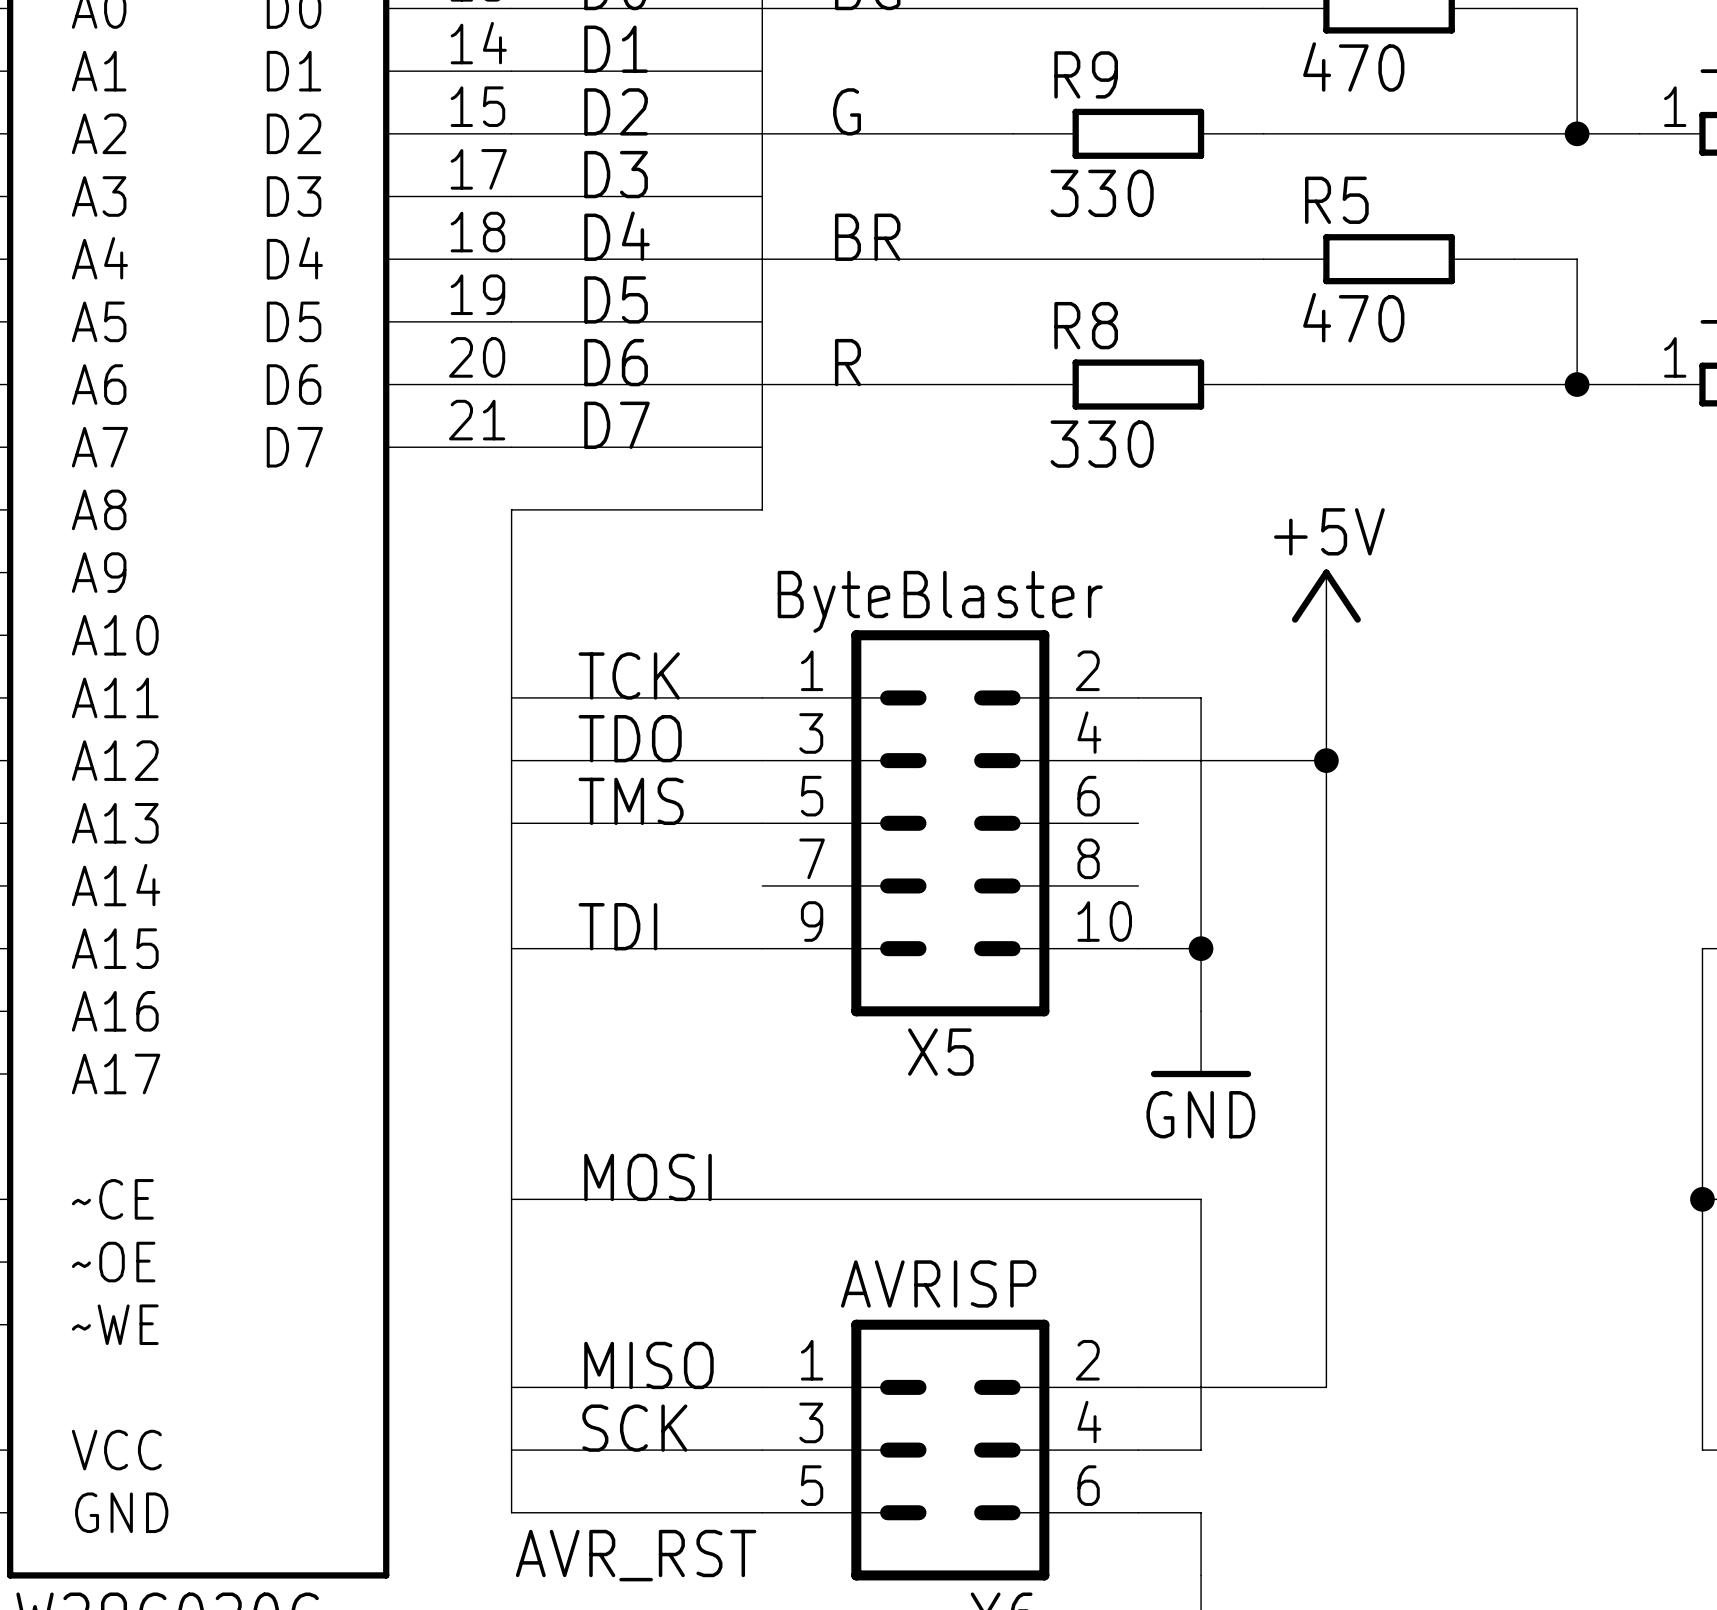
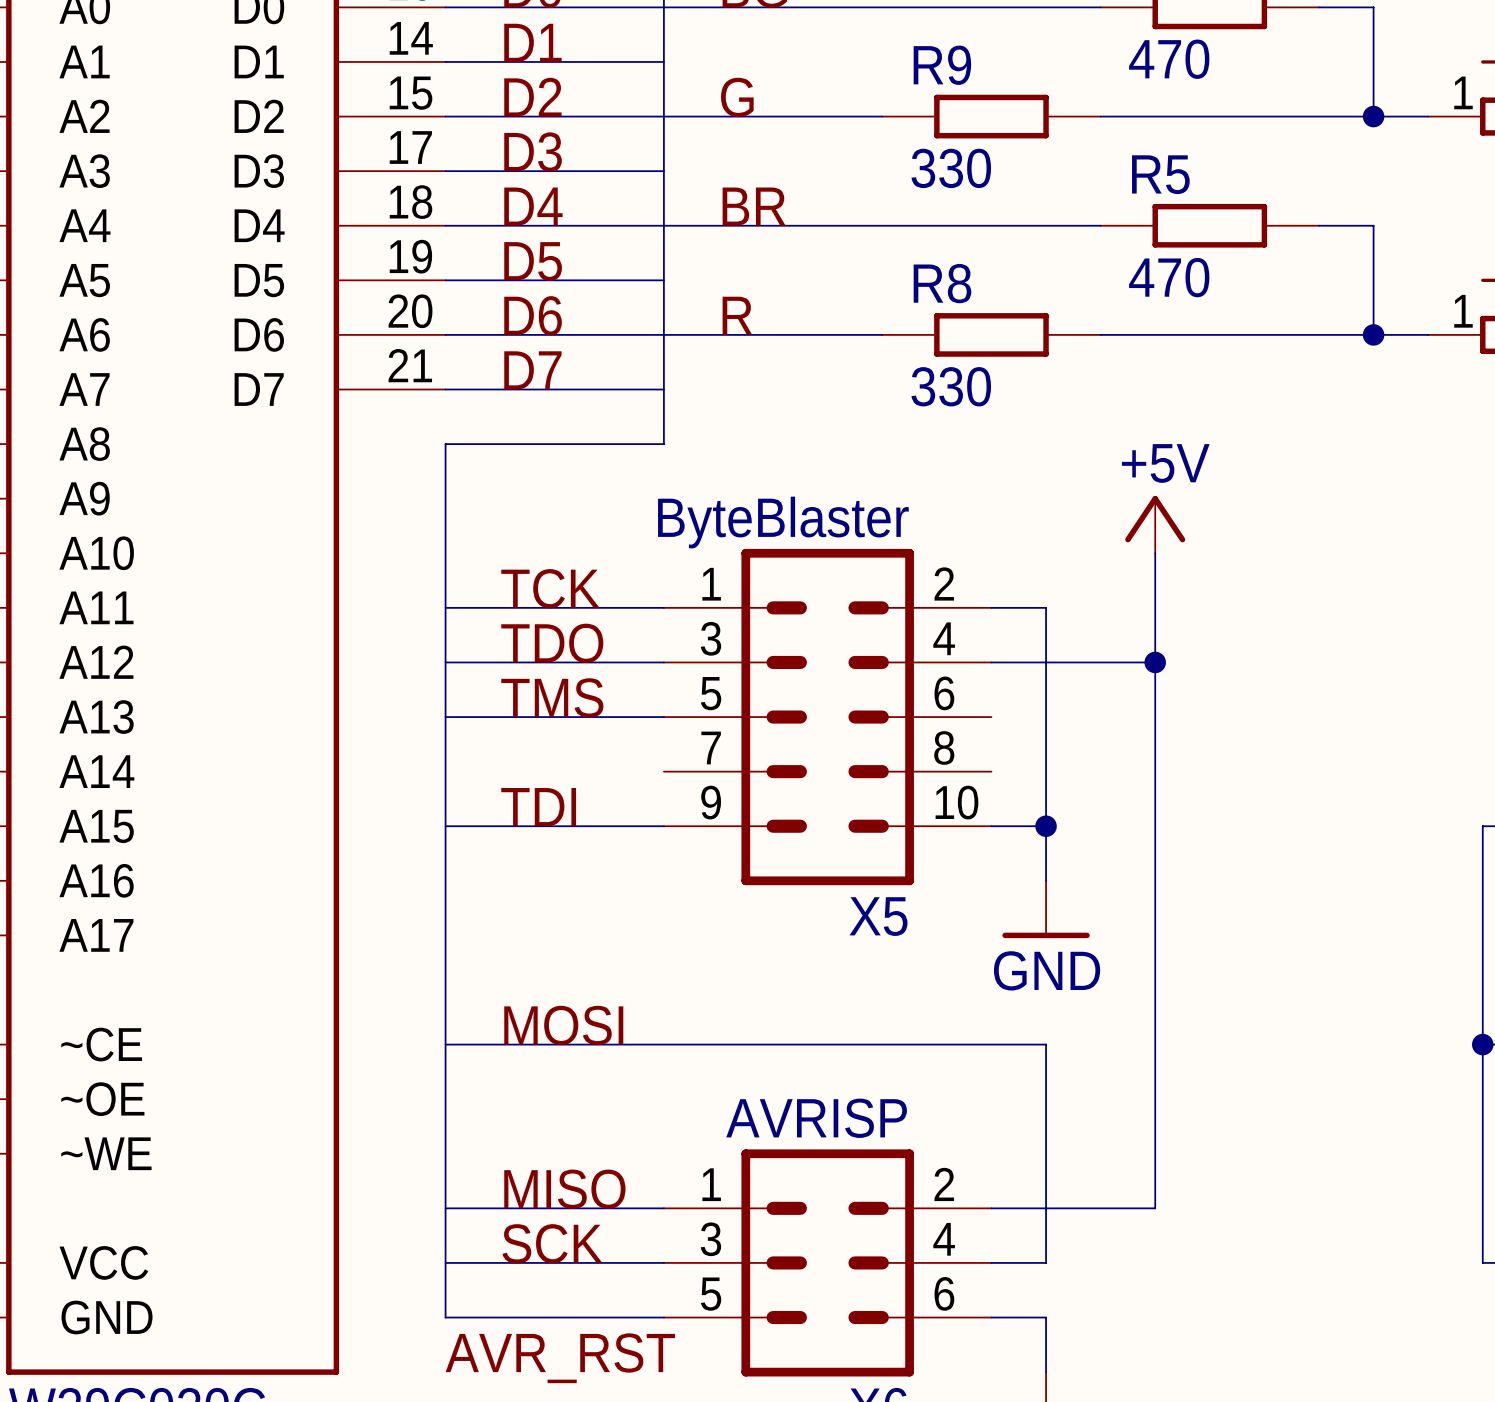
X5 value position: ByteBlaster (940, 601) -> ByteBlaster (783, 522)
X5 name position: X5 (940, 1052) -> X5 (878, 916)

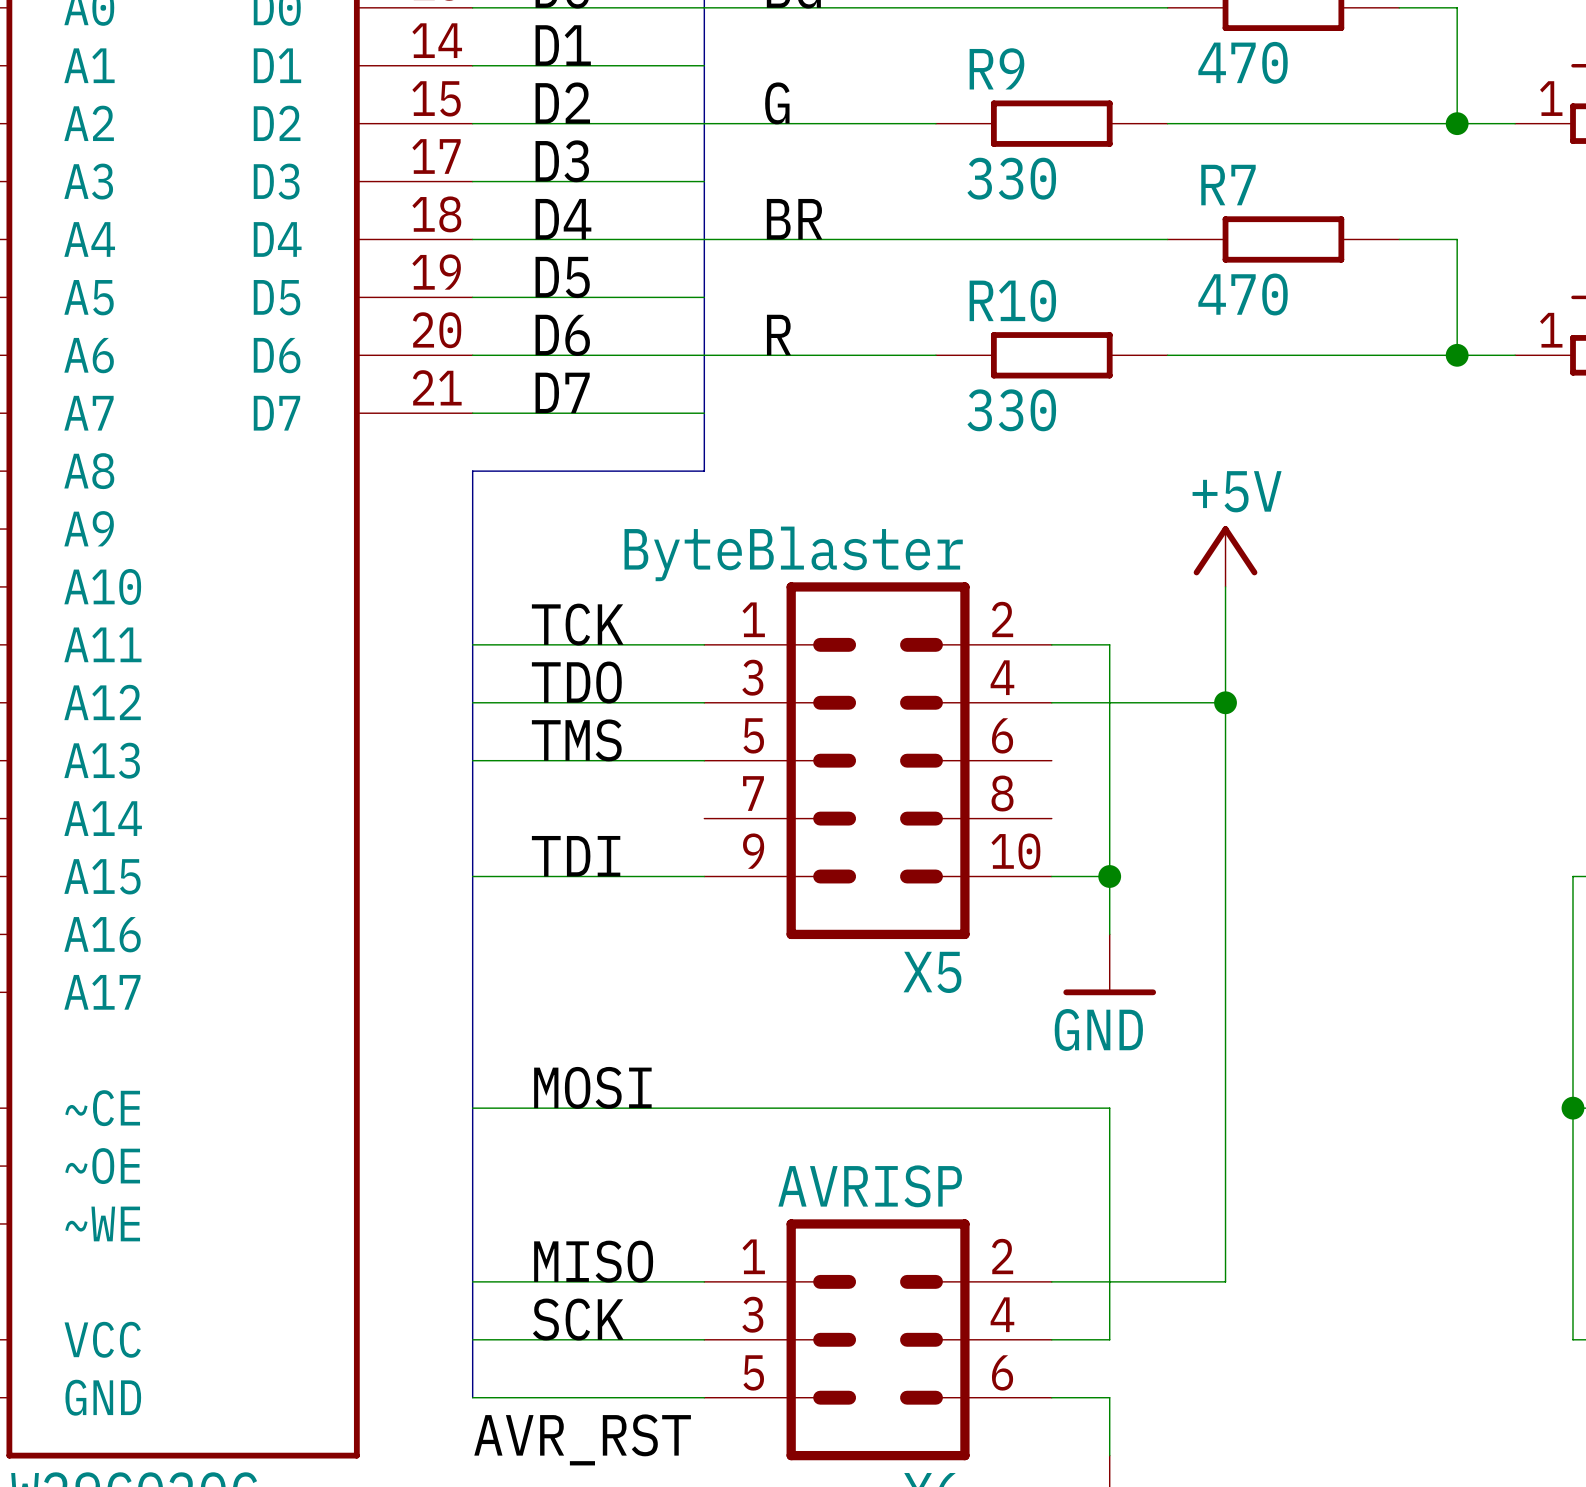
R5 name: R5 (1160, 174) -> R7 (1228, 185)
R8 name: R8 (942, 283) -> R10 (1012, 300)

